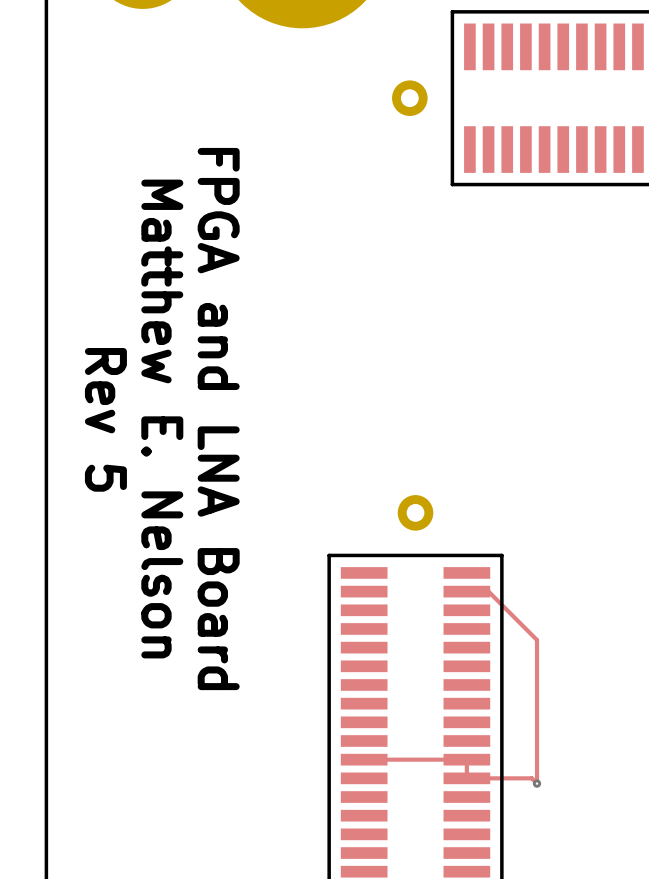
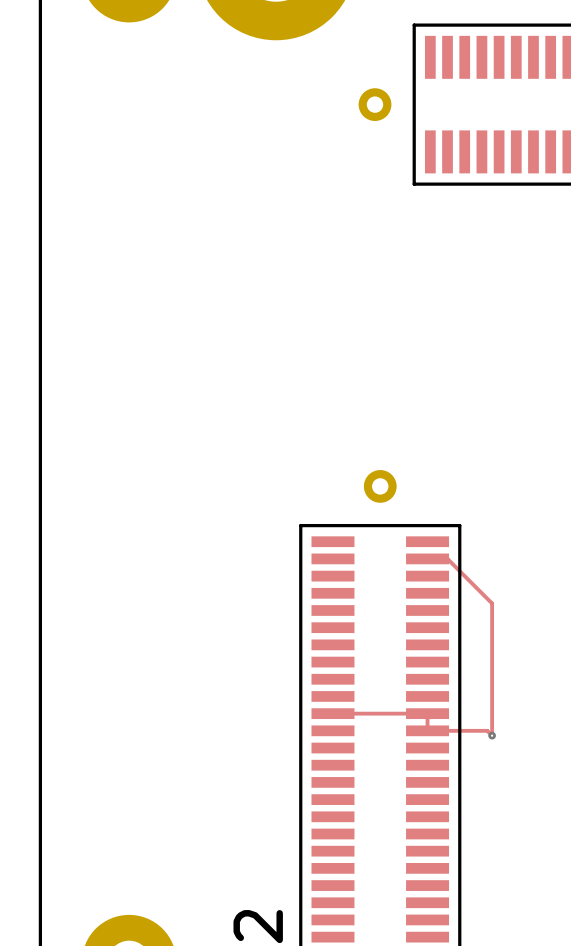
text: Rev 5 (105, 419) -> none
text: Matthew E. Nelson (162, 419) -> none
text: FPGA and LNA Board (218, 419) -> none

